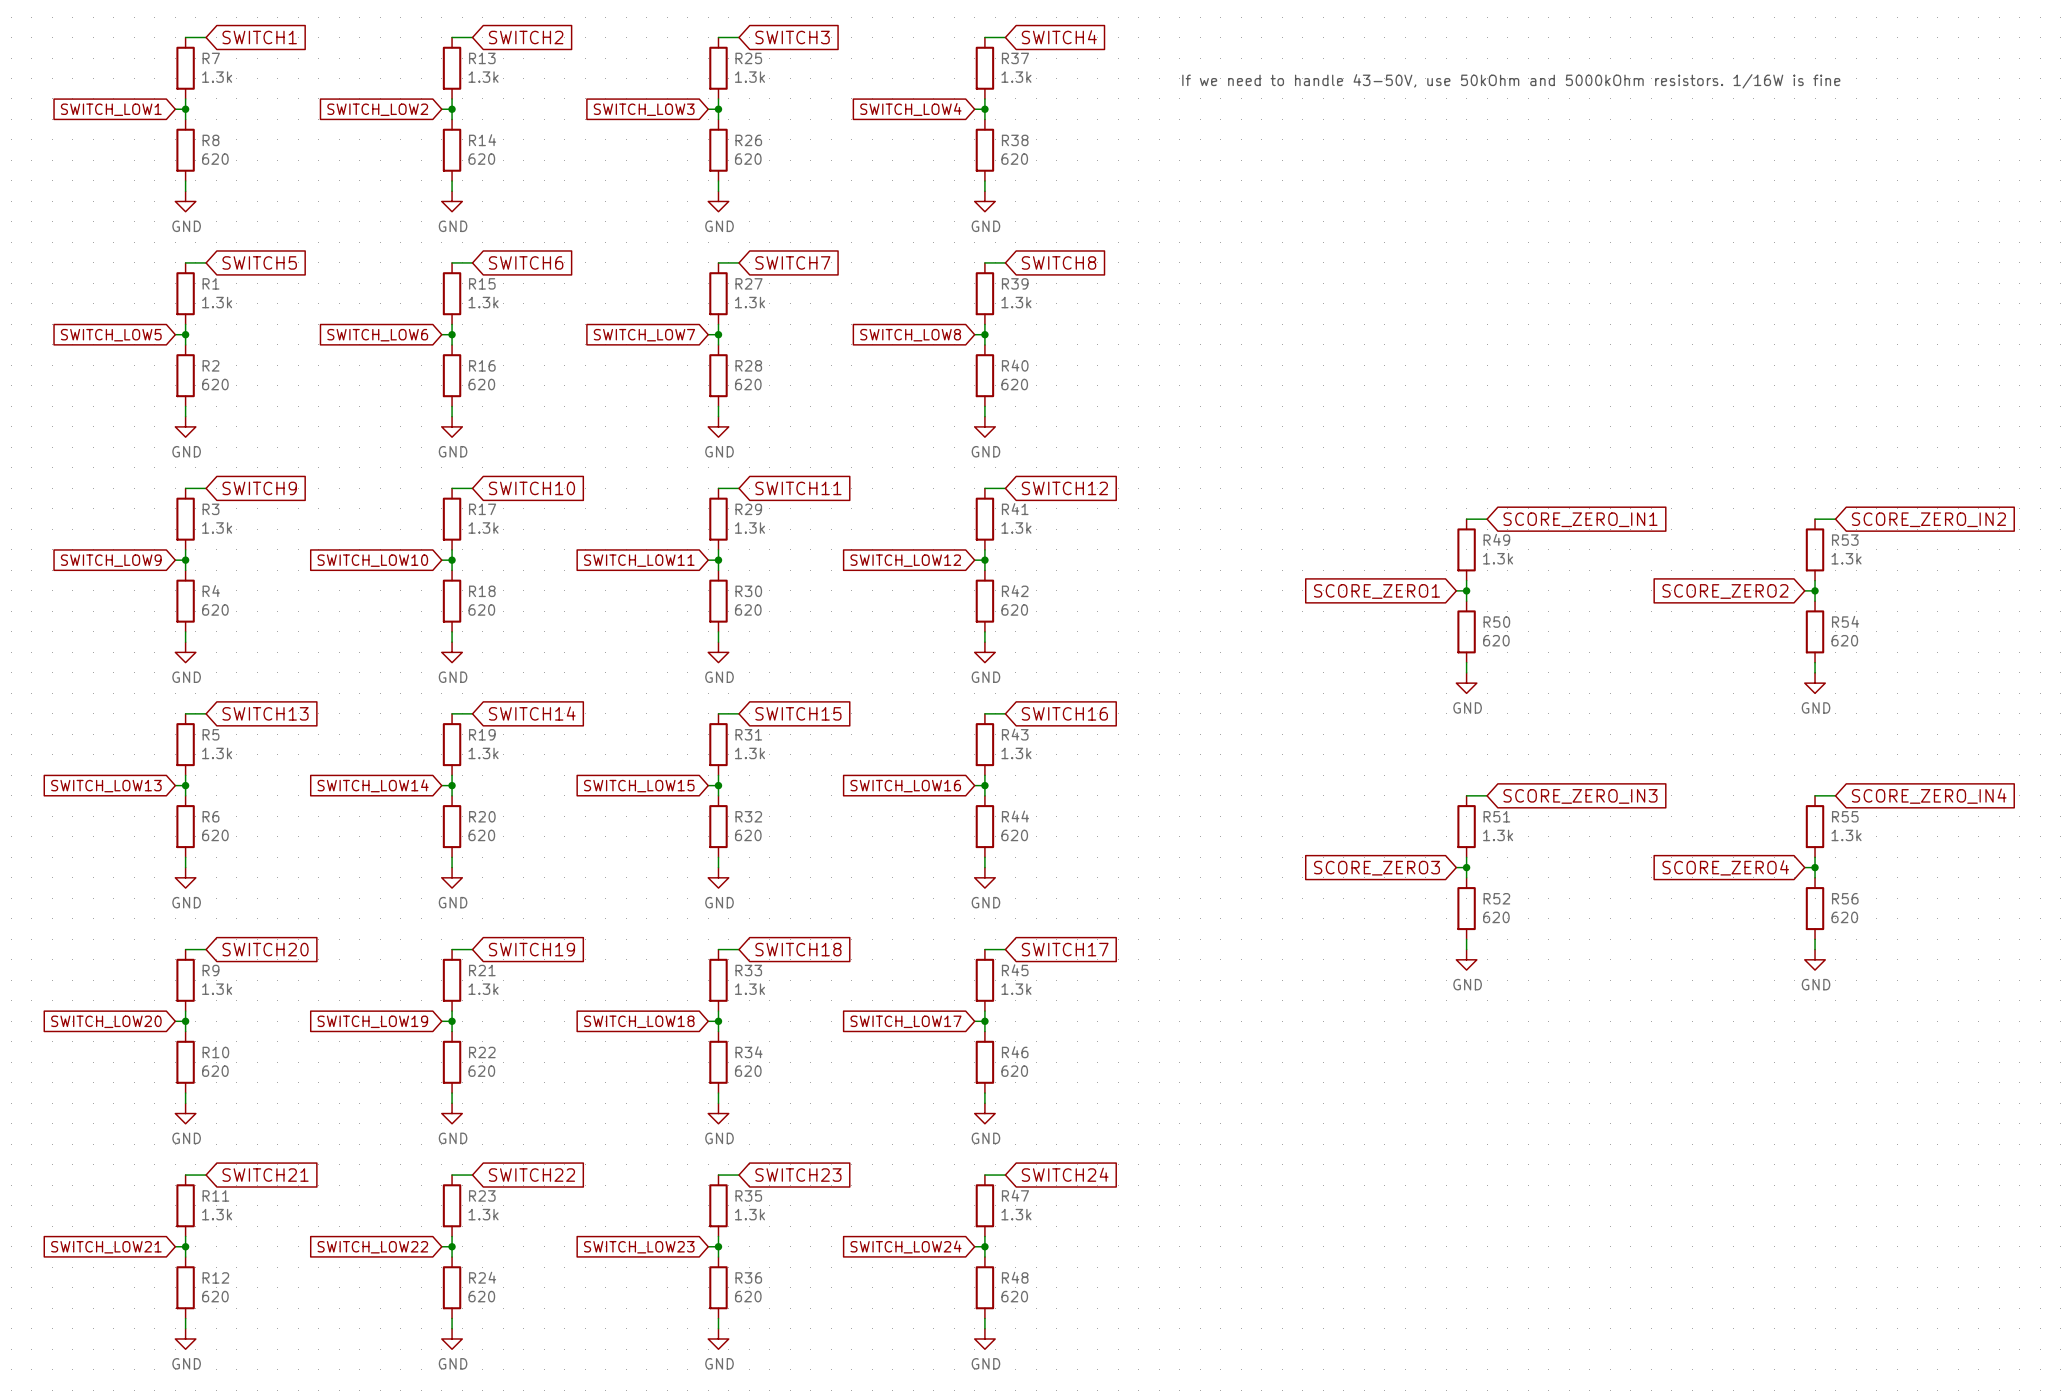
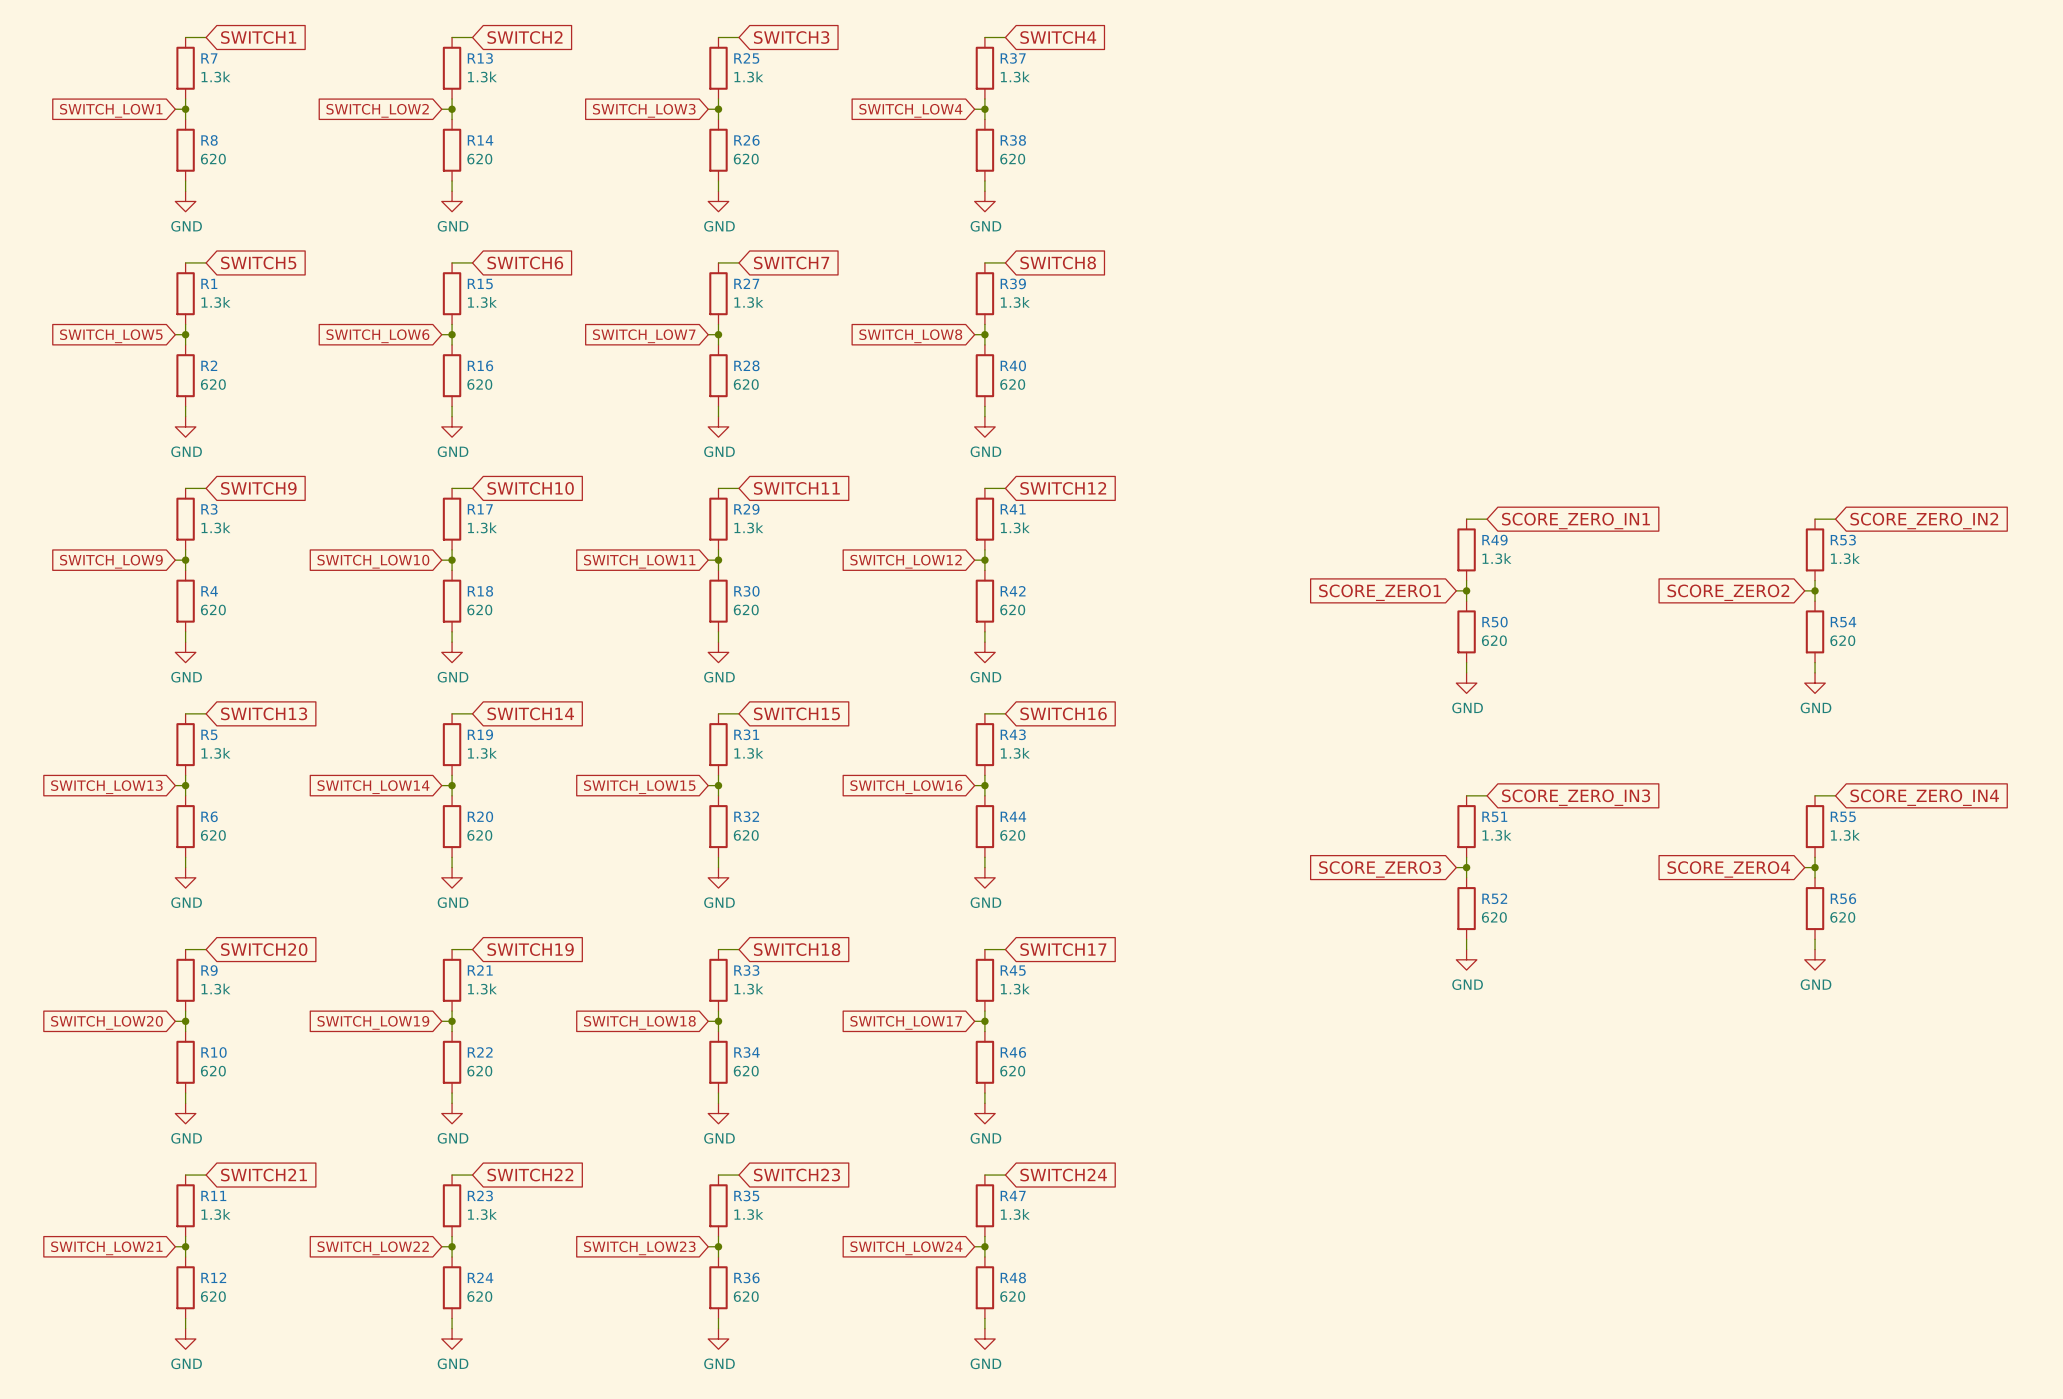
text: If we need to handle 43-50V, use 50kOhm and 5000kOhm resistors. 1/16W is fine (1511, 81) -> none

